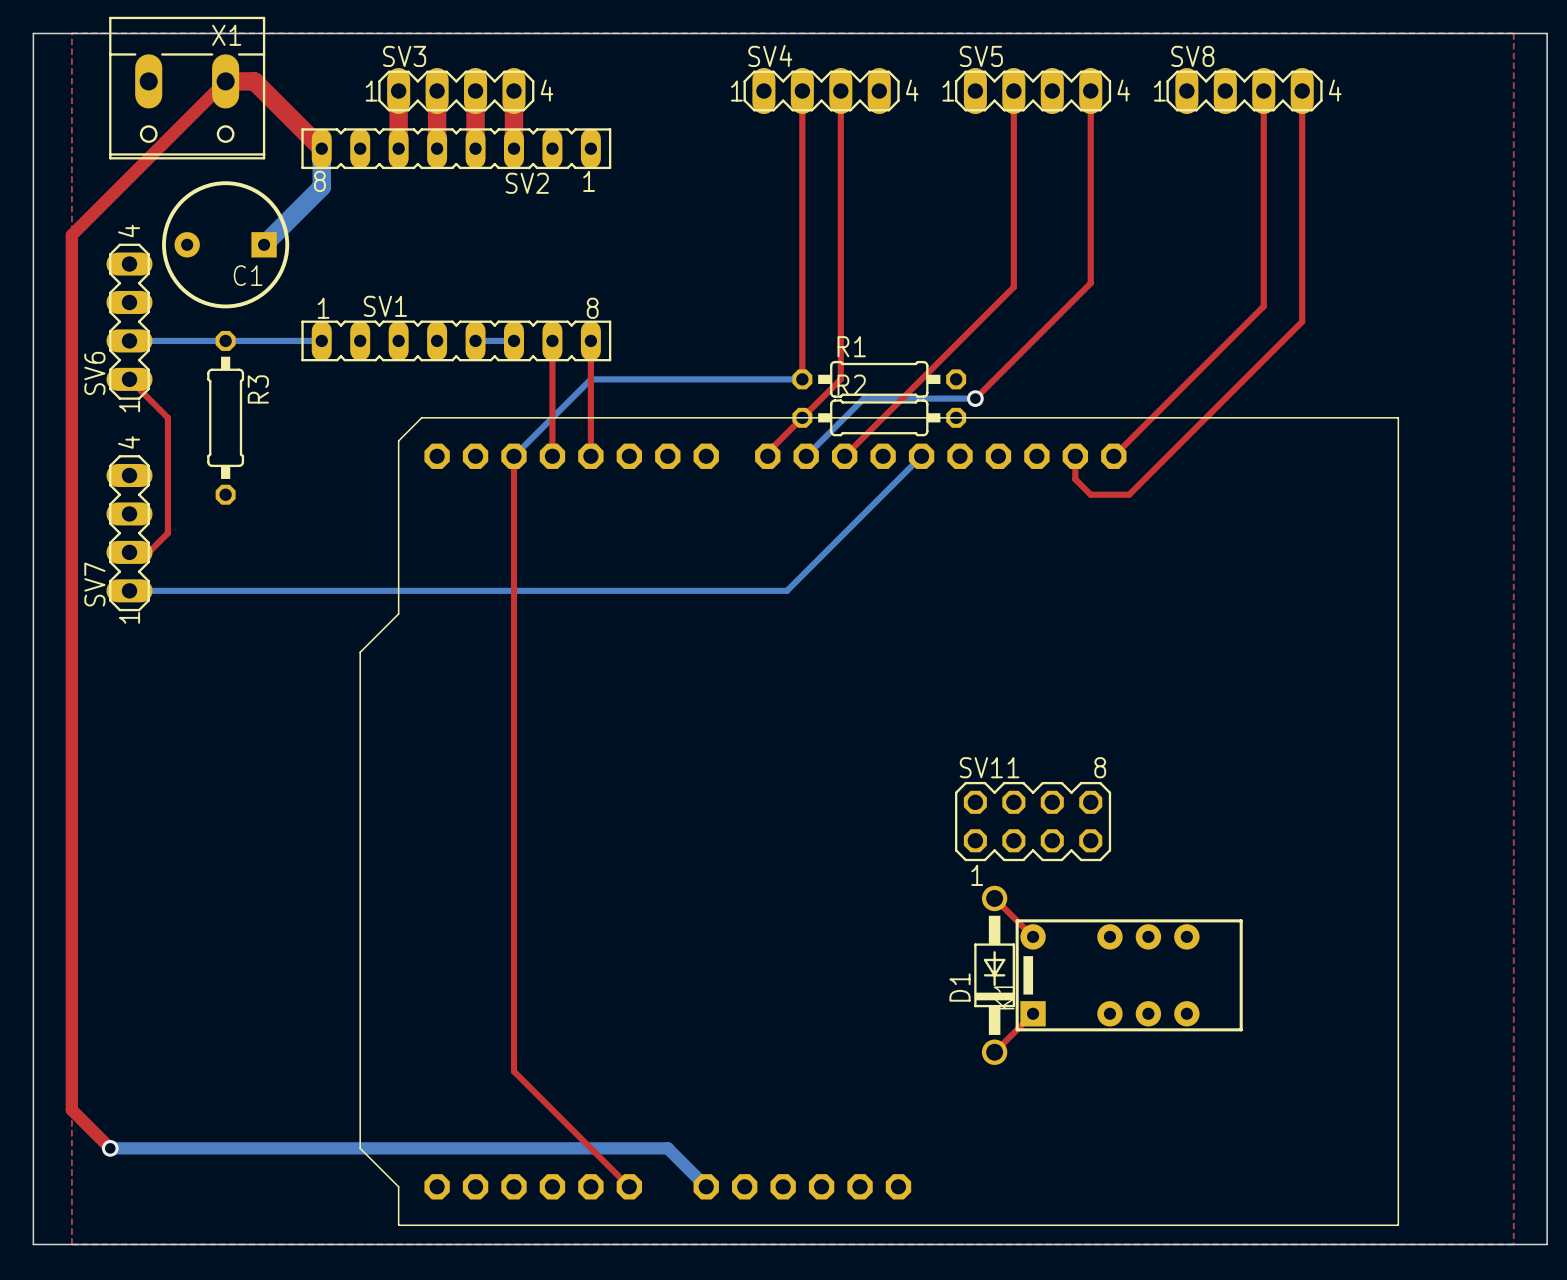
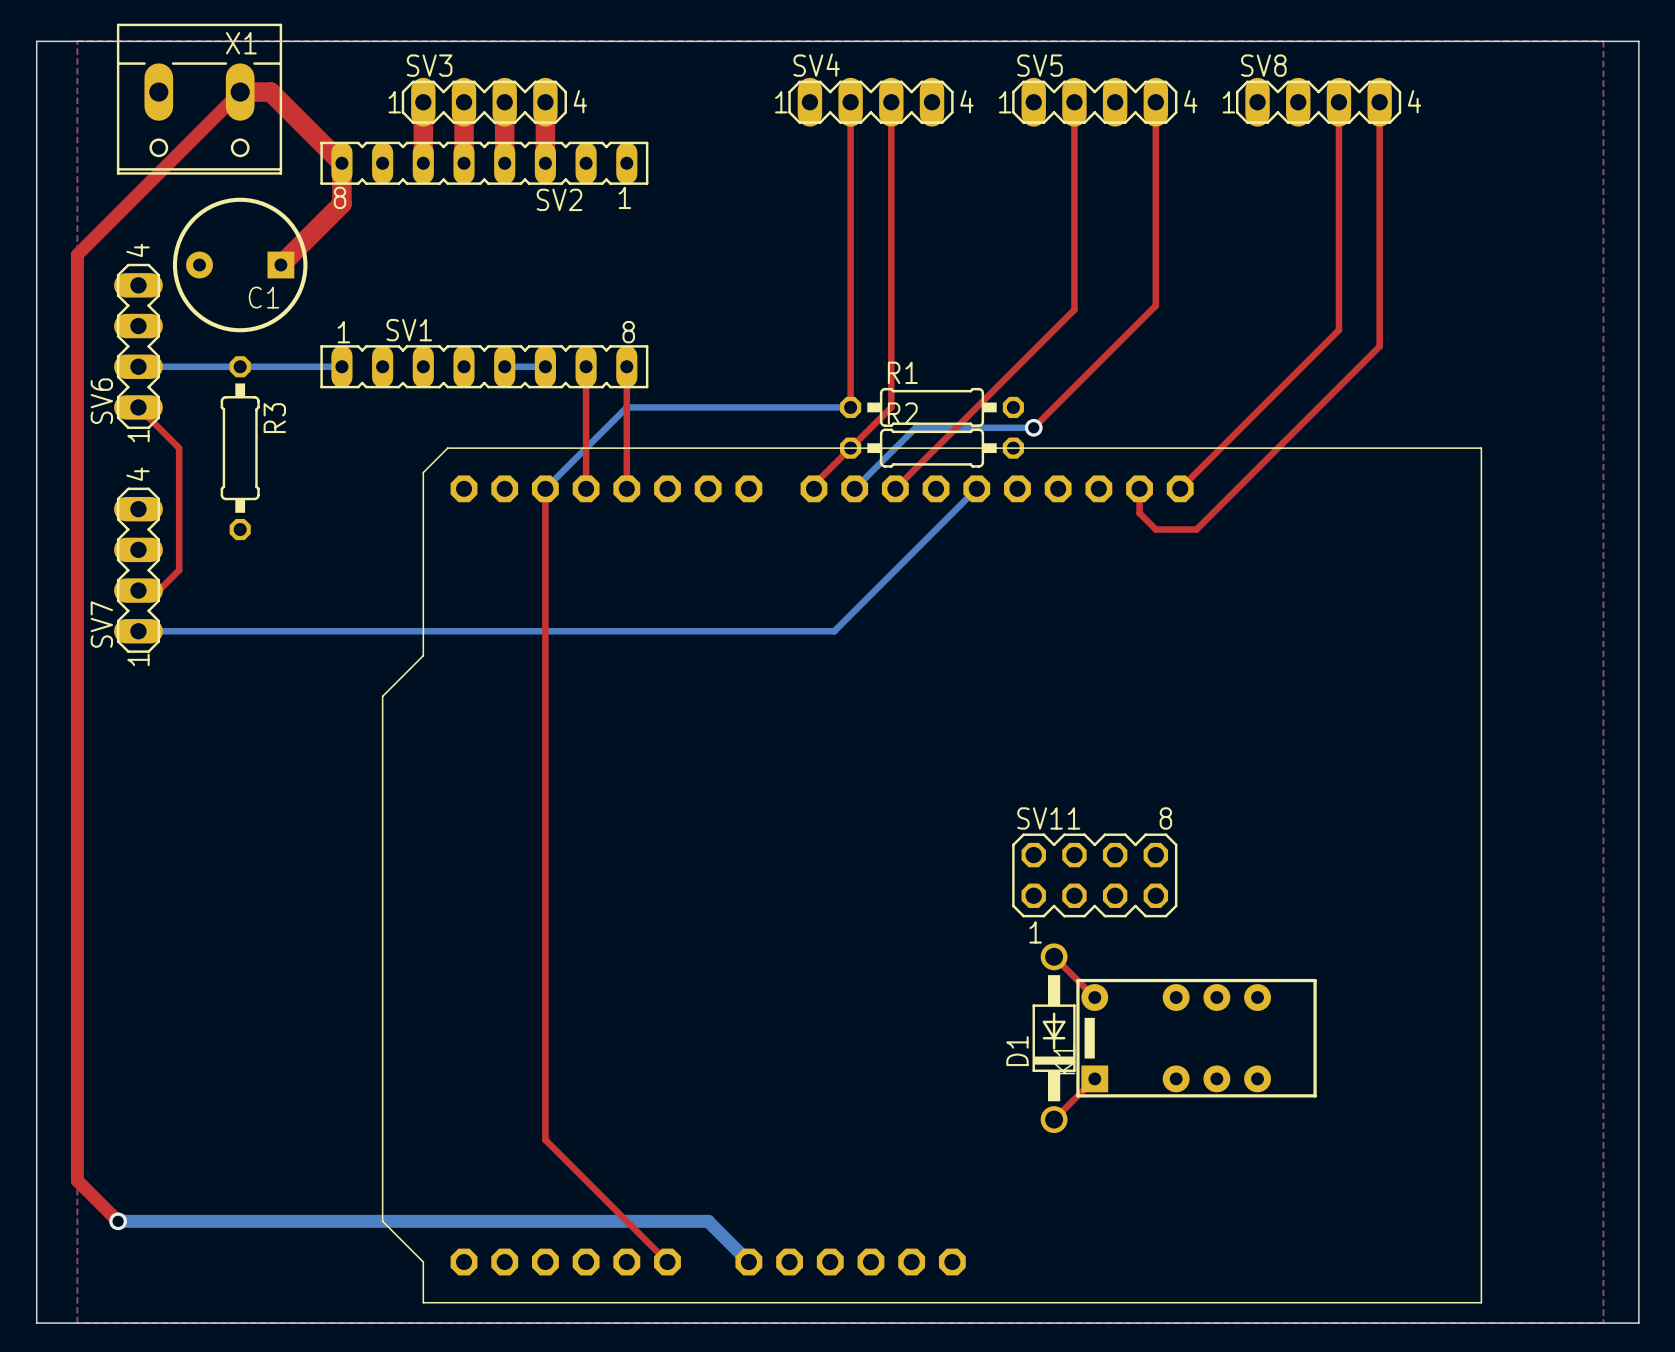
top track: none -> (341, 163) (341, 203) (280, 265)
bottom track: (321, 148) (321, 187) (264, 244) -> none

